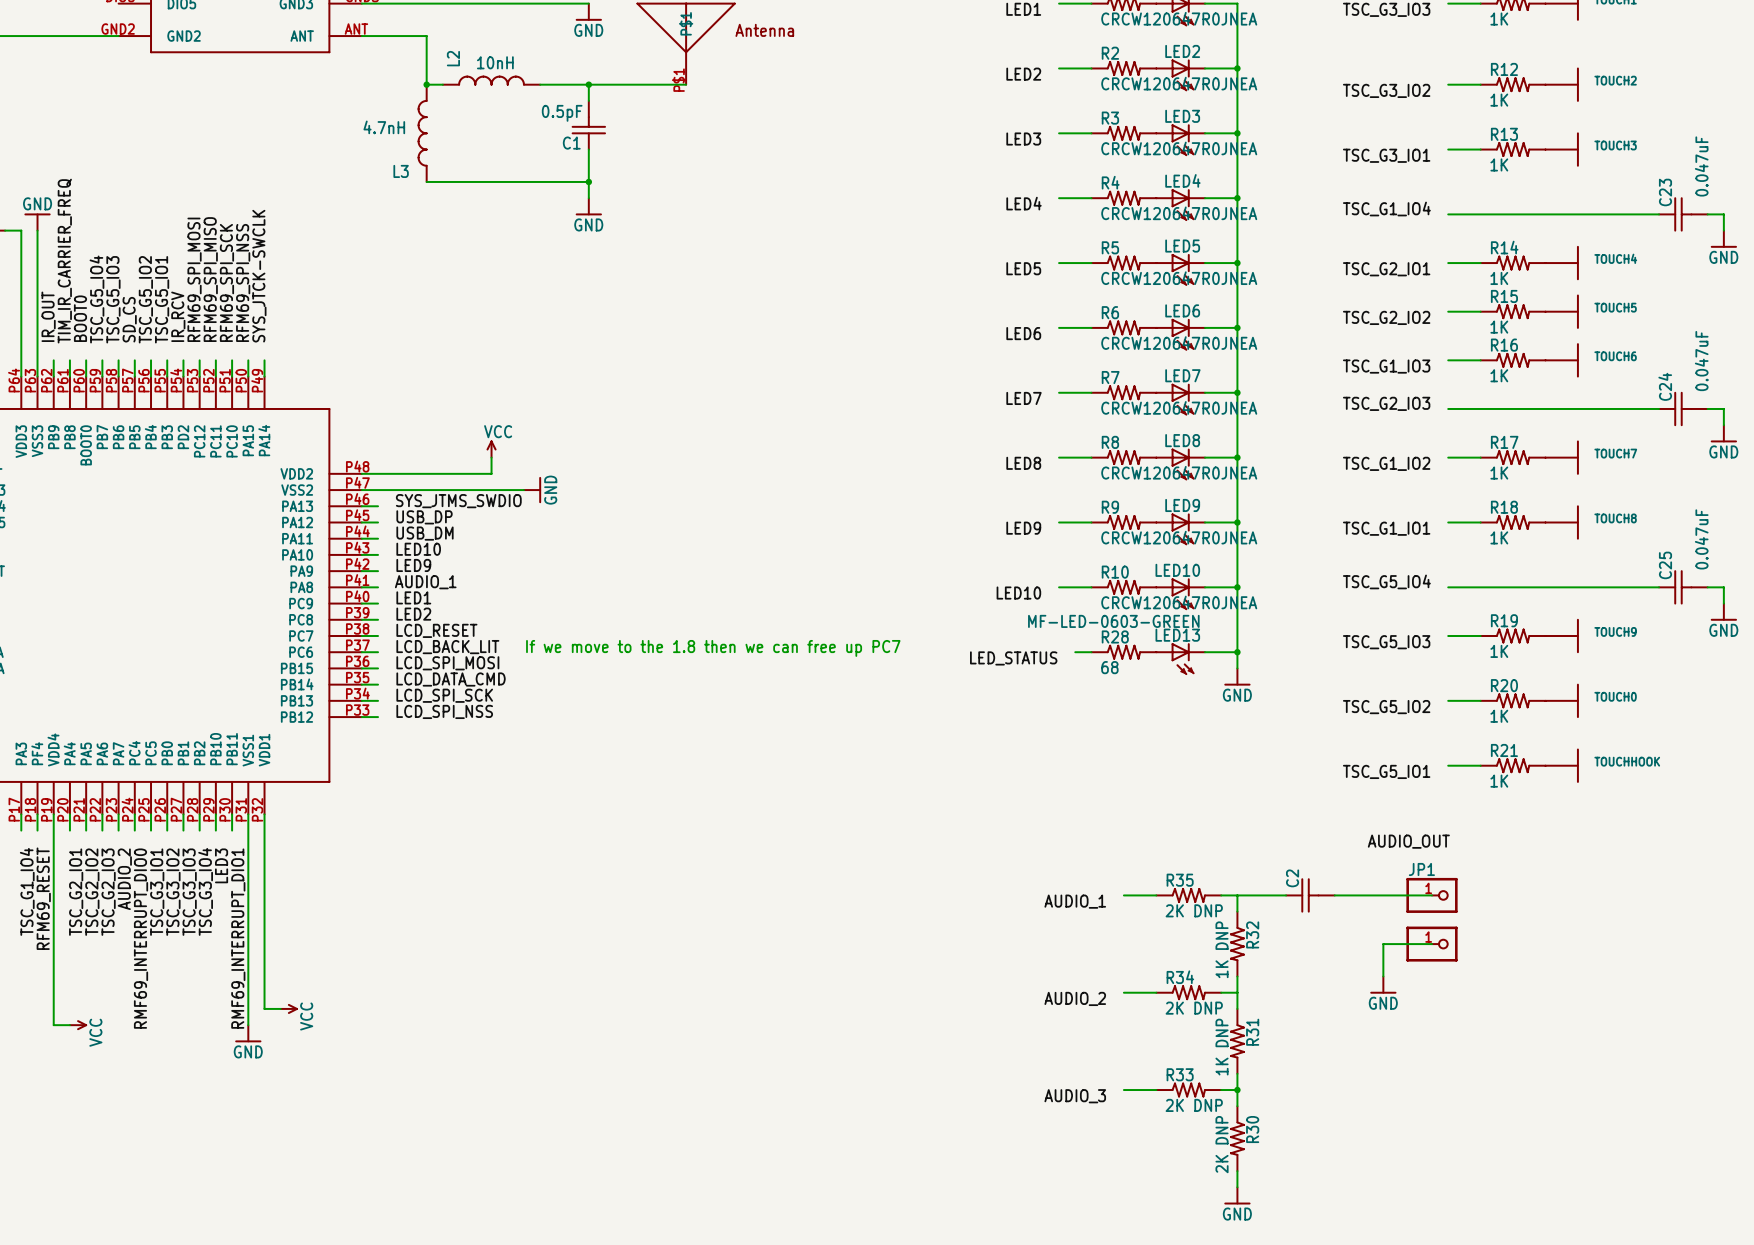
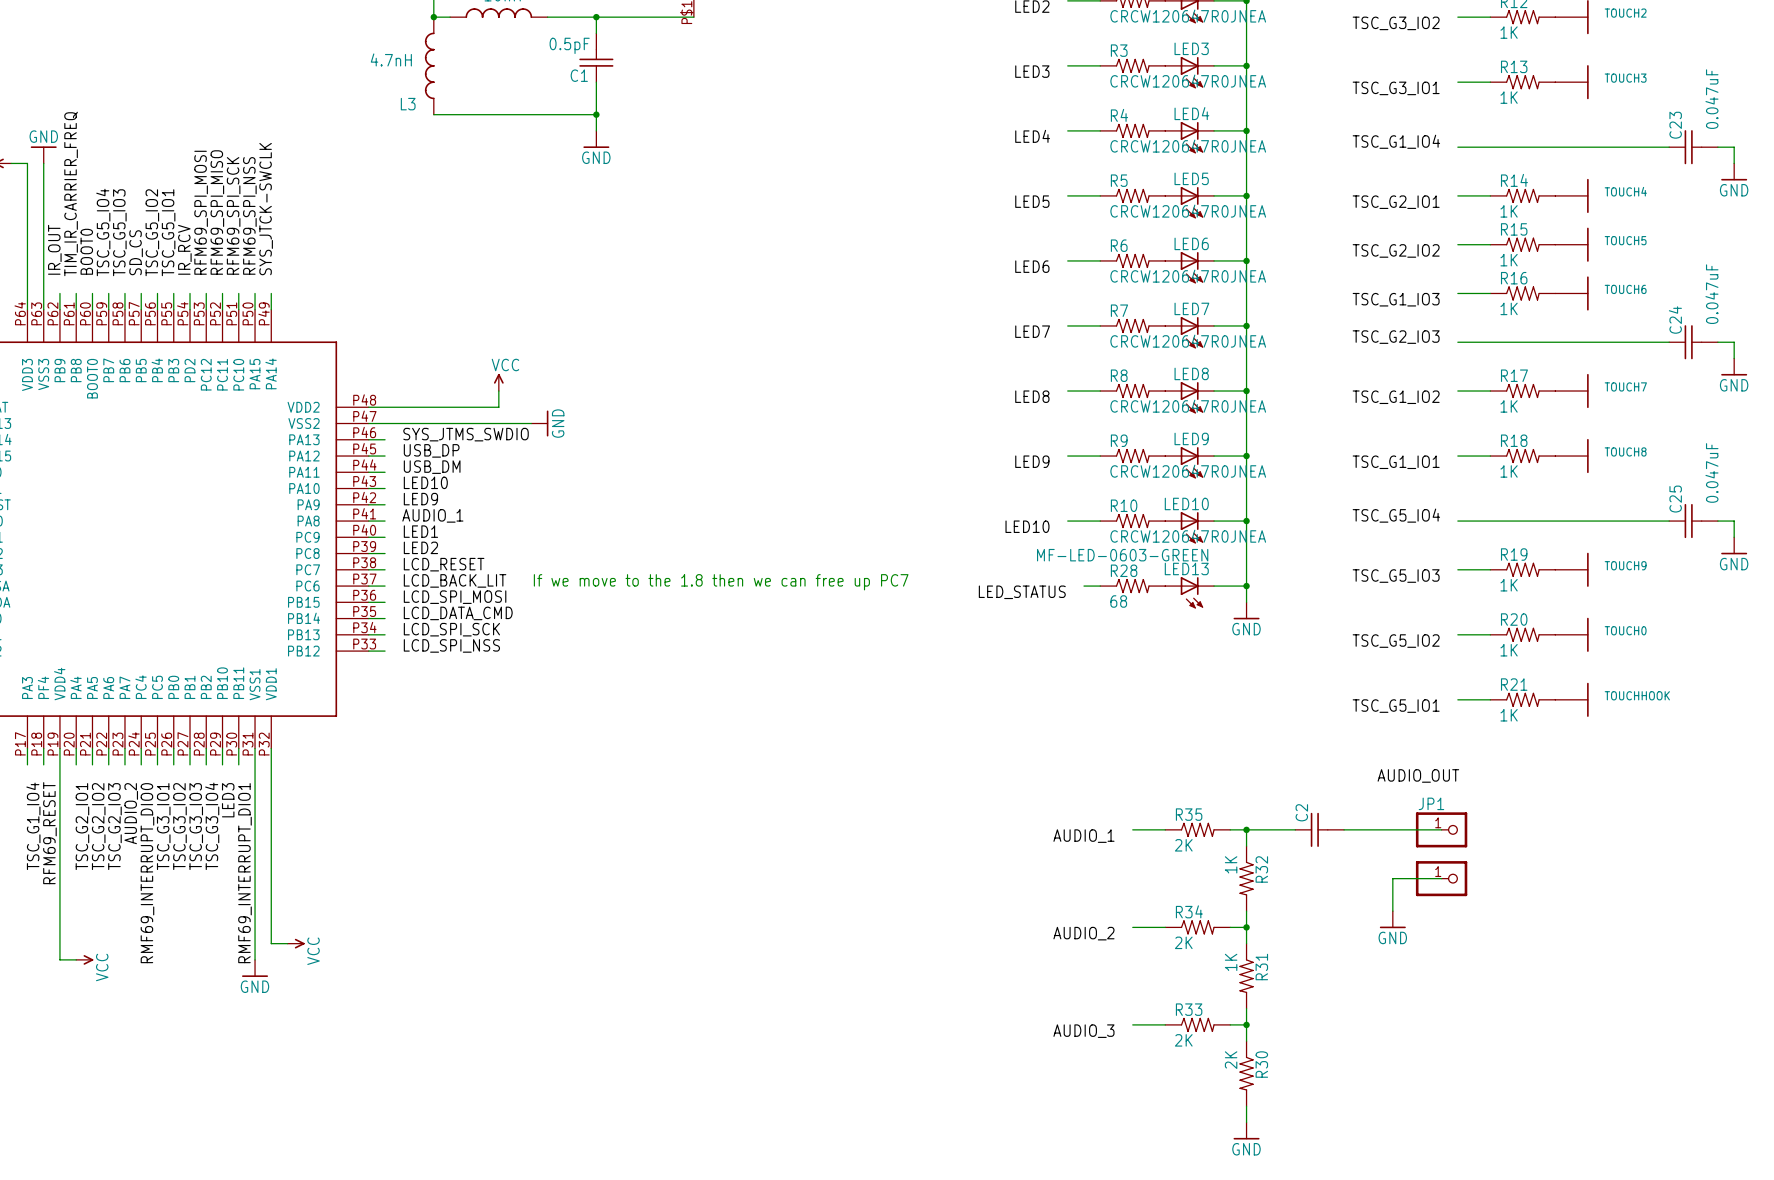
junction: none -> (1246, 829)
R35 value: 2K DNP (1194, 910) -> 2K (1183, 845)
R32 value: 1K DNP (1222, 949) -> 1K (1231, 864)
junction: none -> (1246, 927)
R34 value: 2K DNP (1194, 1008) -> 2K (1183, 942)
R31 value: 1K DNP (1222, 1047) -> 1K (1231, 962)
R33 value: 2K DNP (1194, 1105) -> 2K (1183, 1040)
R30 value: 2K DNP (1222, 1144) -> 2K (1231, 1060)

